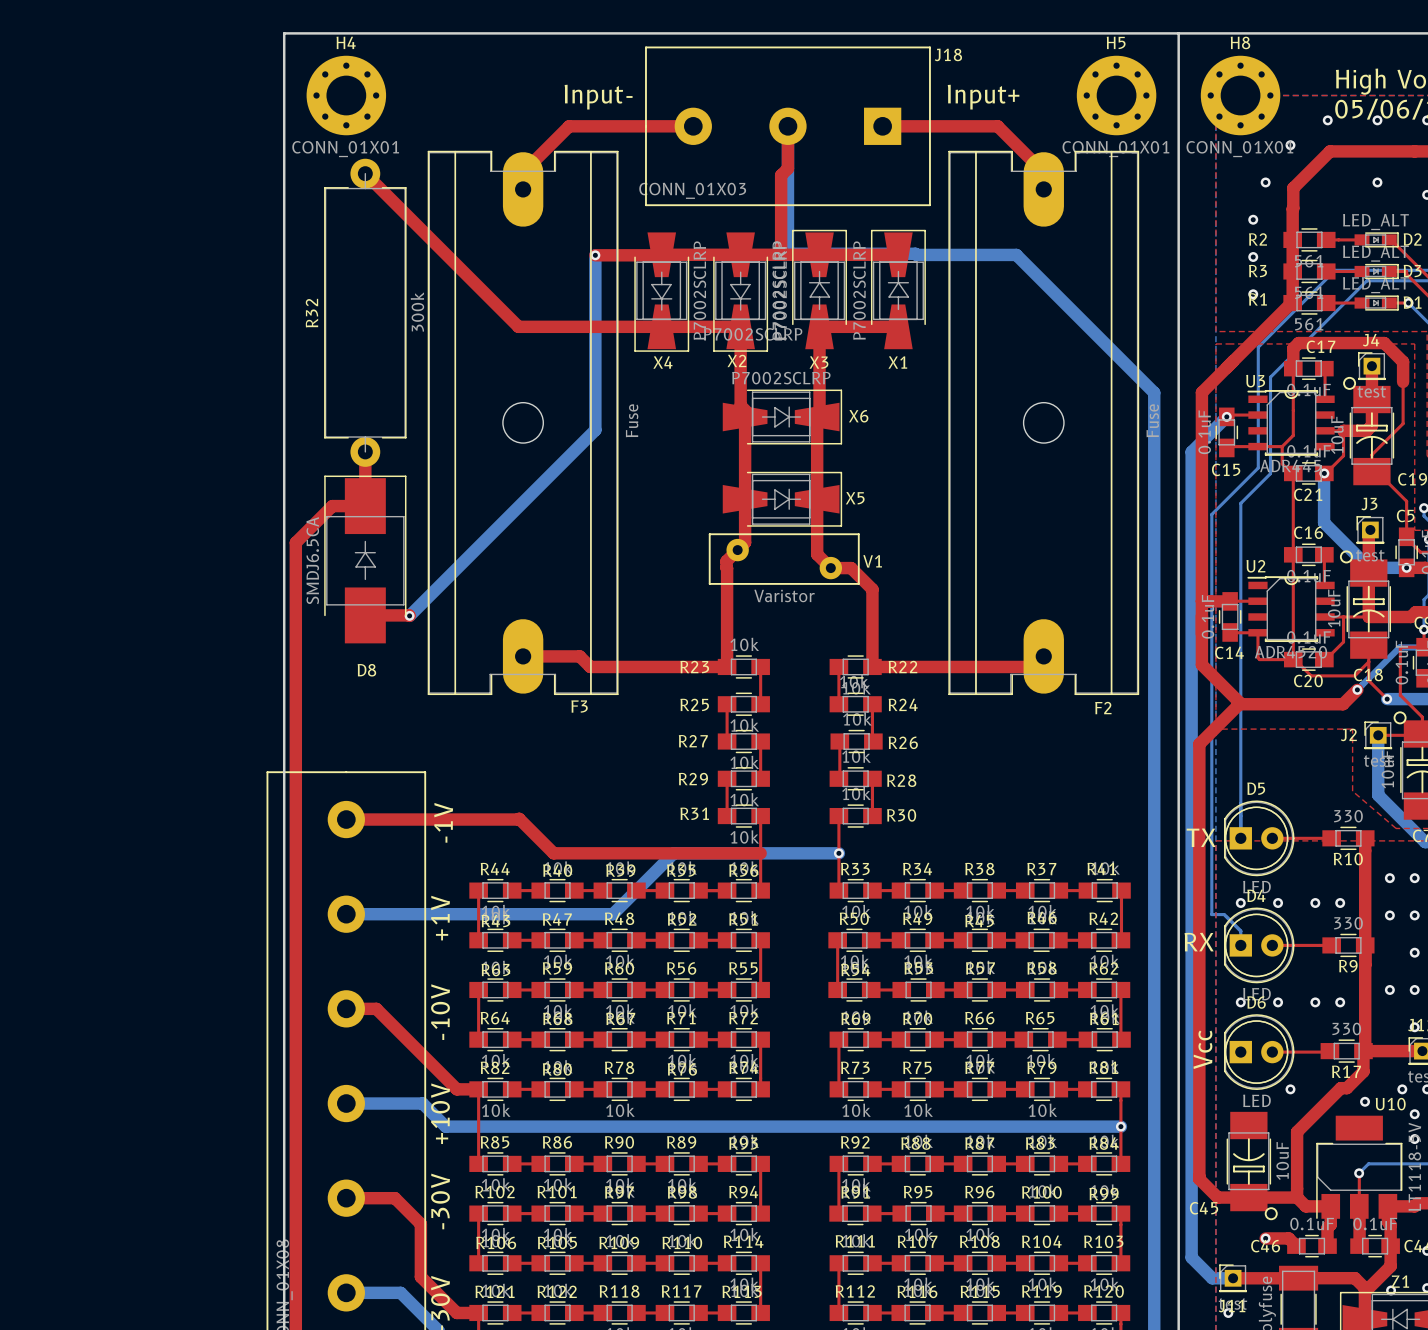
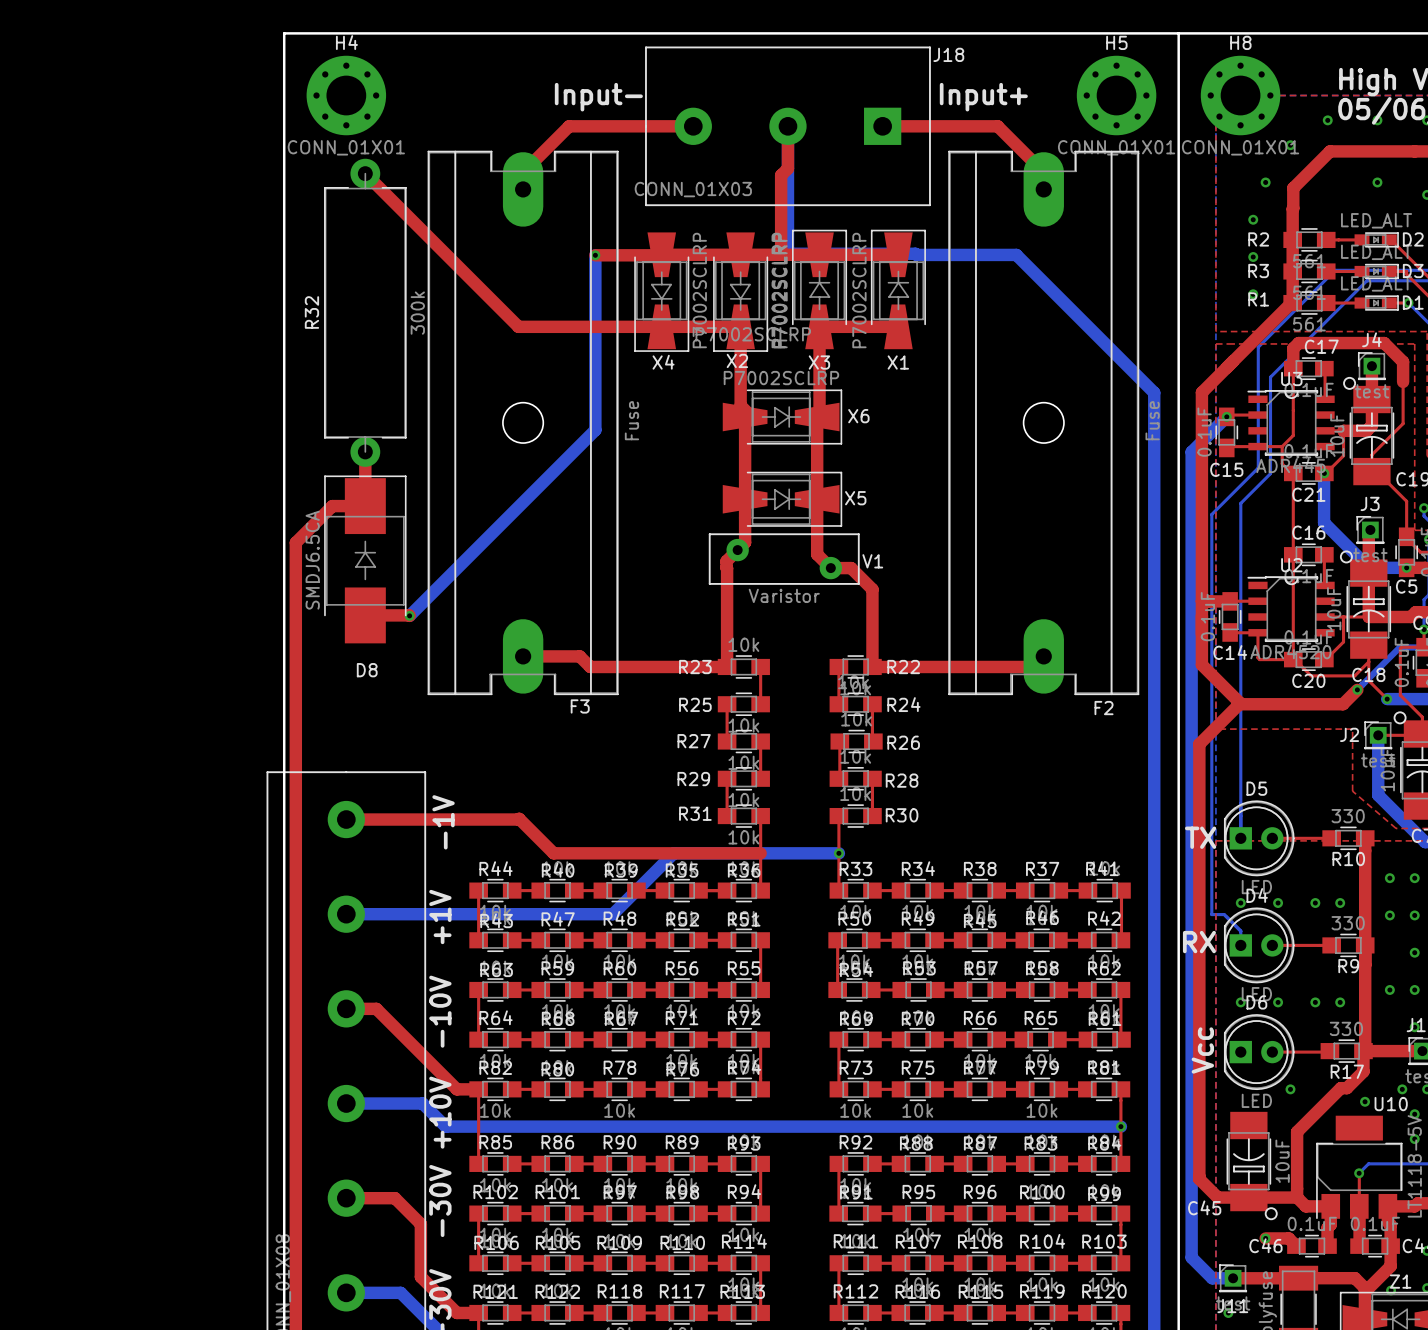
U3 name position: U3 (1255, 381) -> U3 (1291, 378)
C5 name position: C5 (1405, 515) -> C5 (1406, 586)
U2 name position: U2 (1255, 566) -> U2 (1291, 565)

